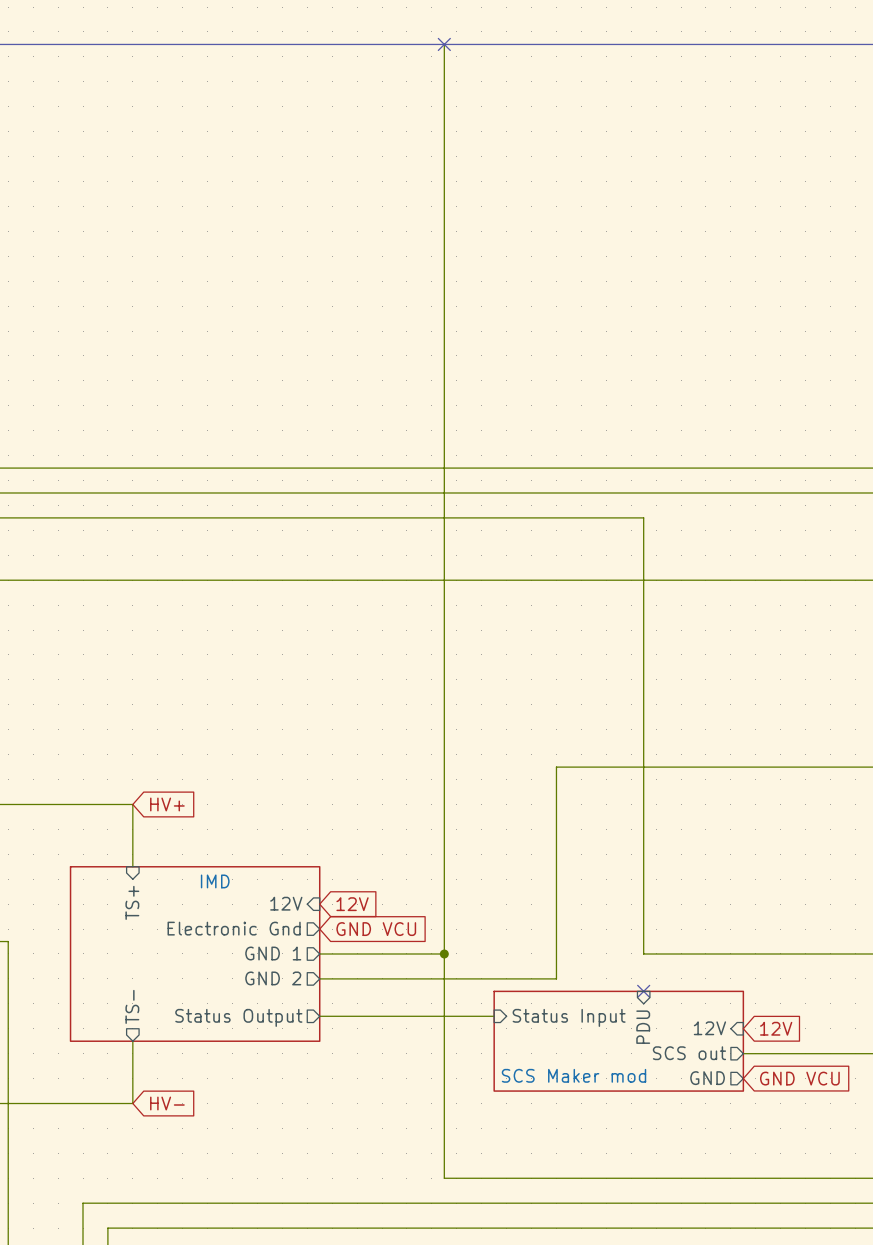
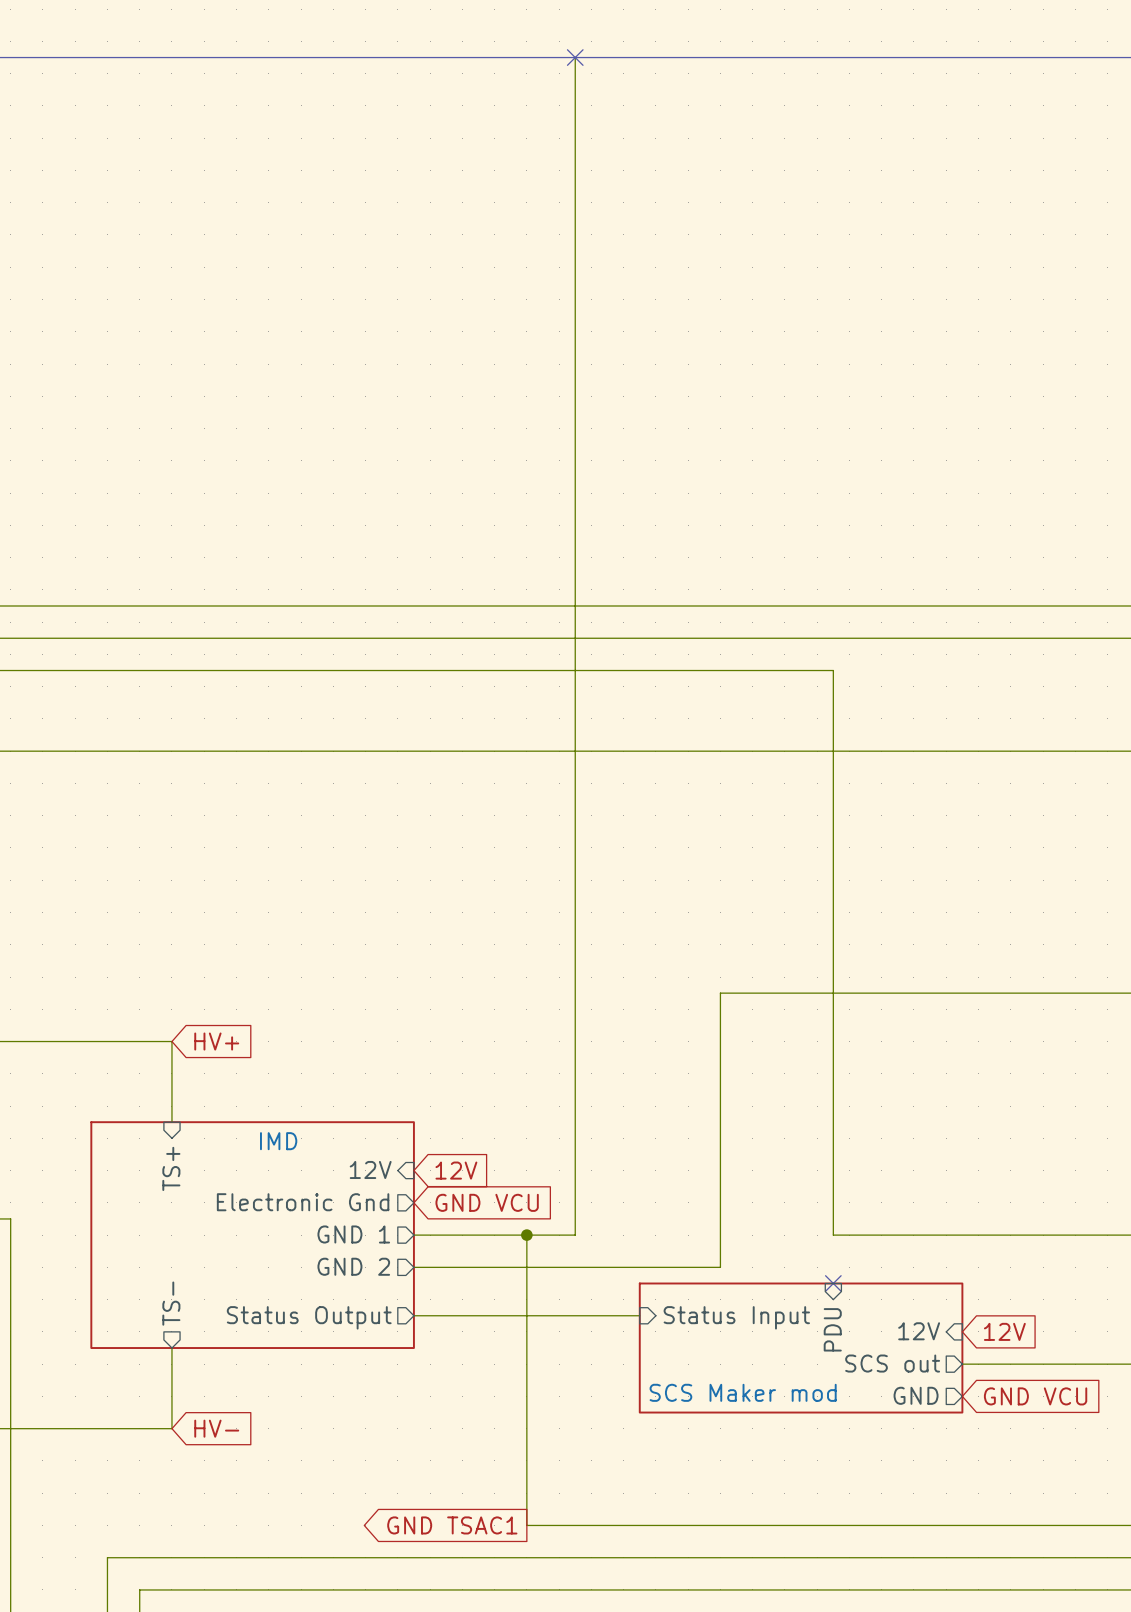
wire: (444, 953) (444, 1178) -> (526, 1235) (526, 1525) (575, 1525)
junction position: (444, 953) -> (526, 1235)
global label: none -> GND TSAC1 (452, 1525)

